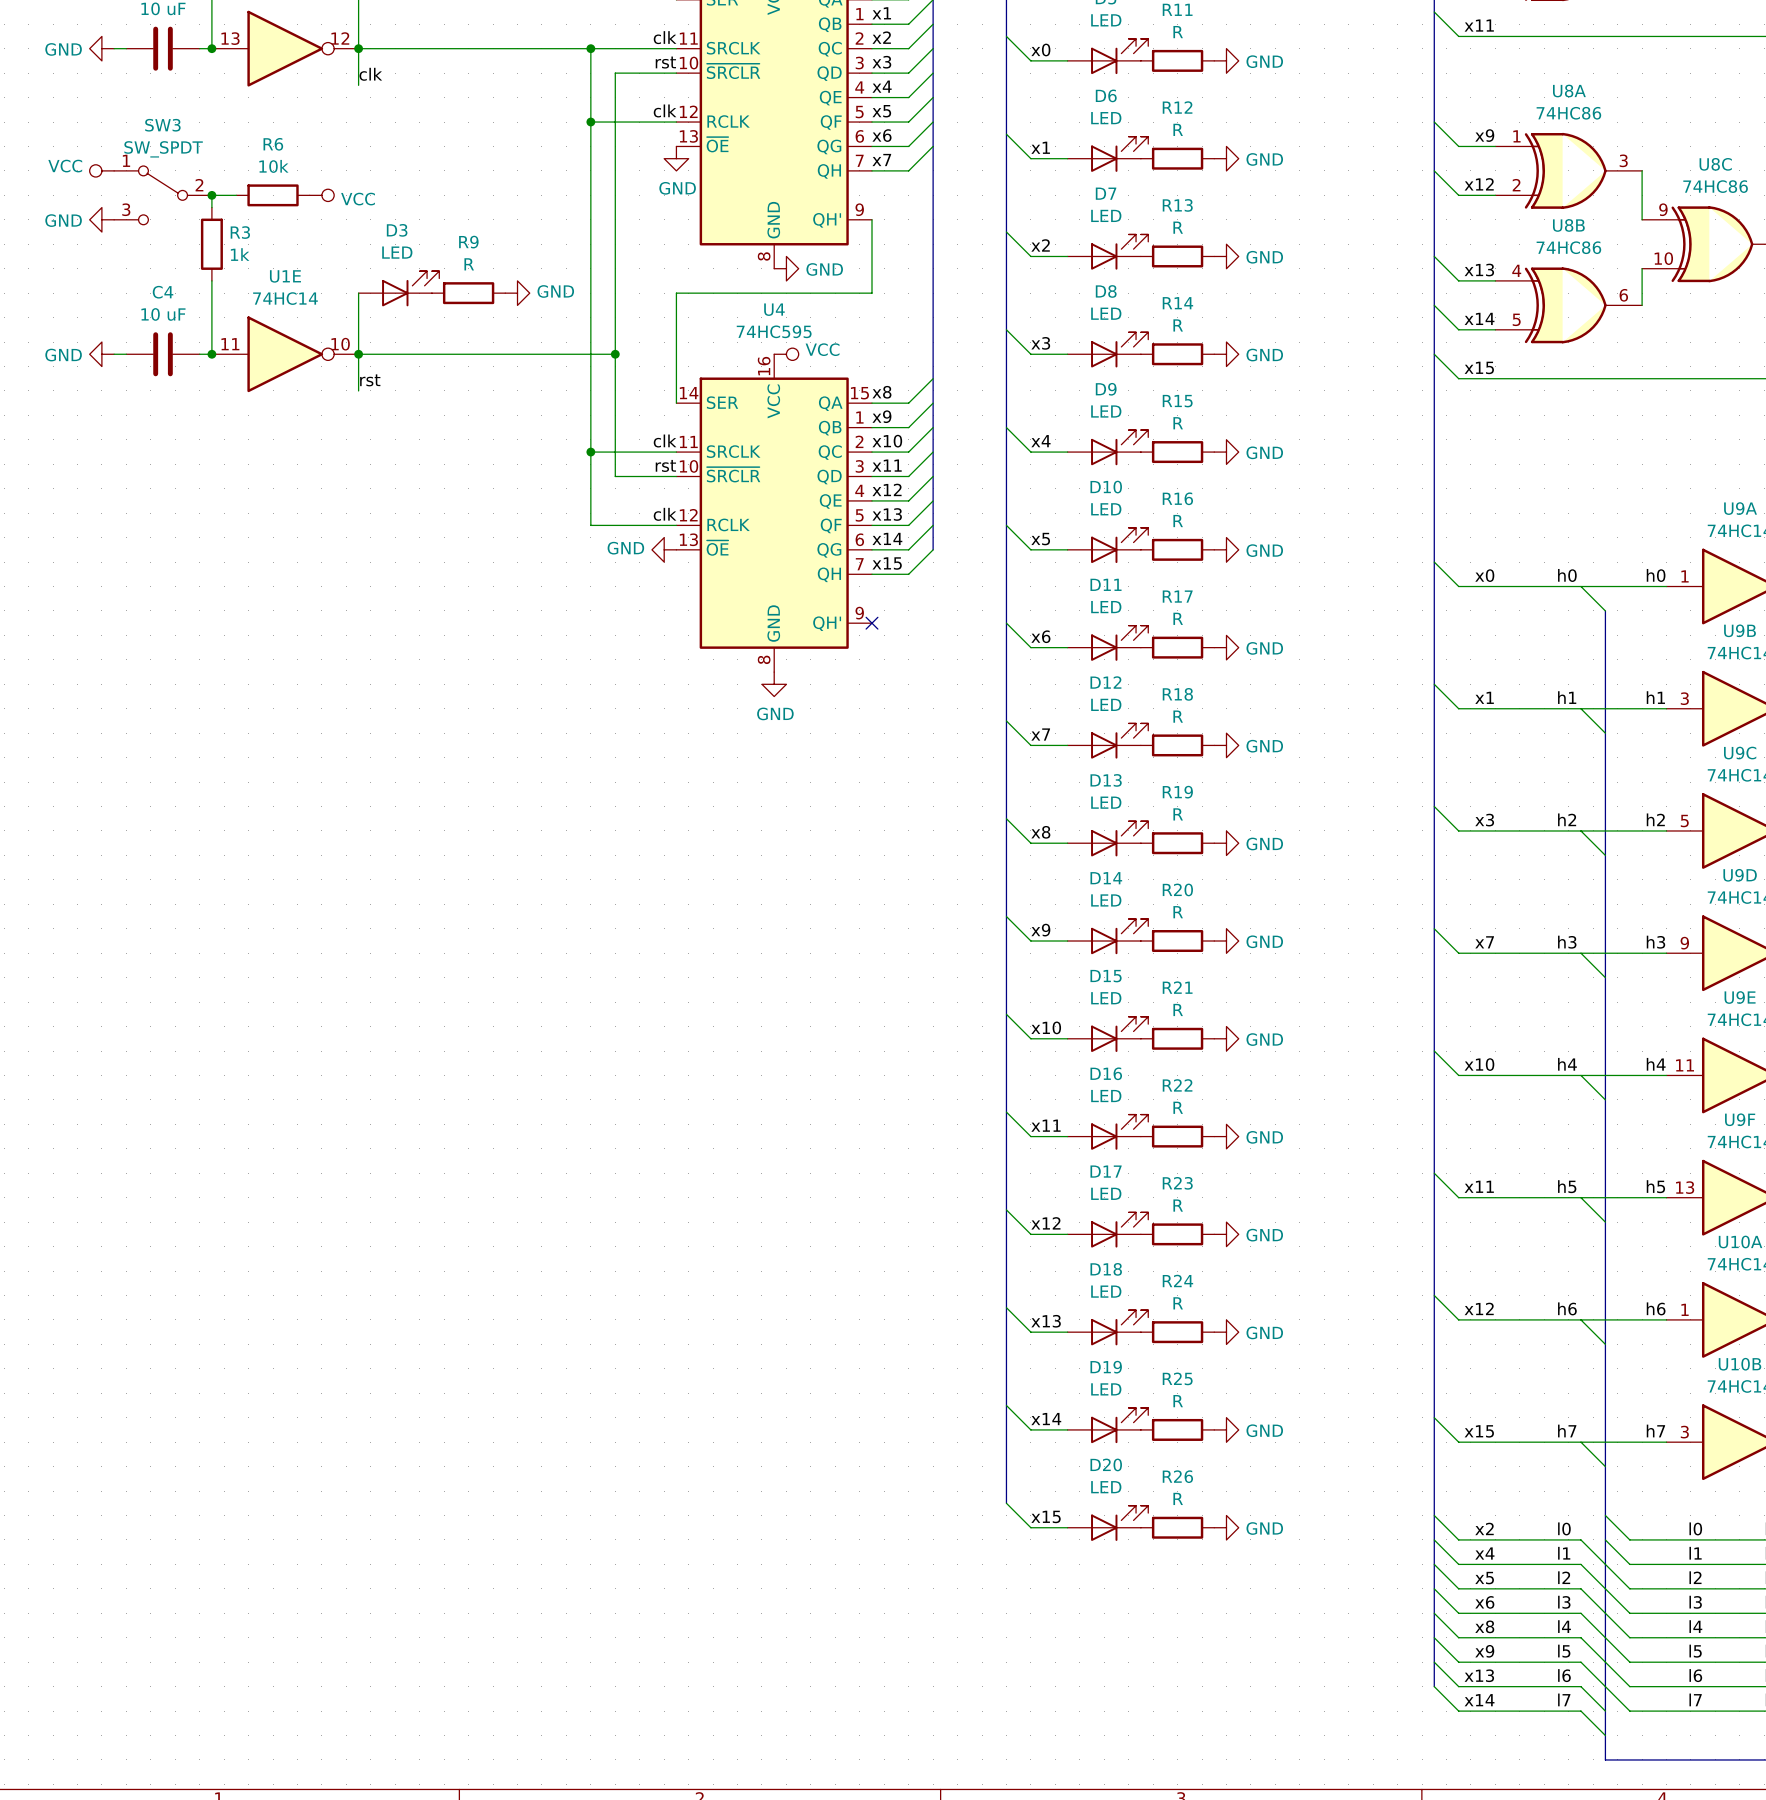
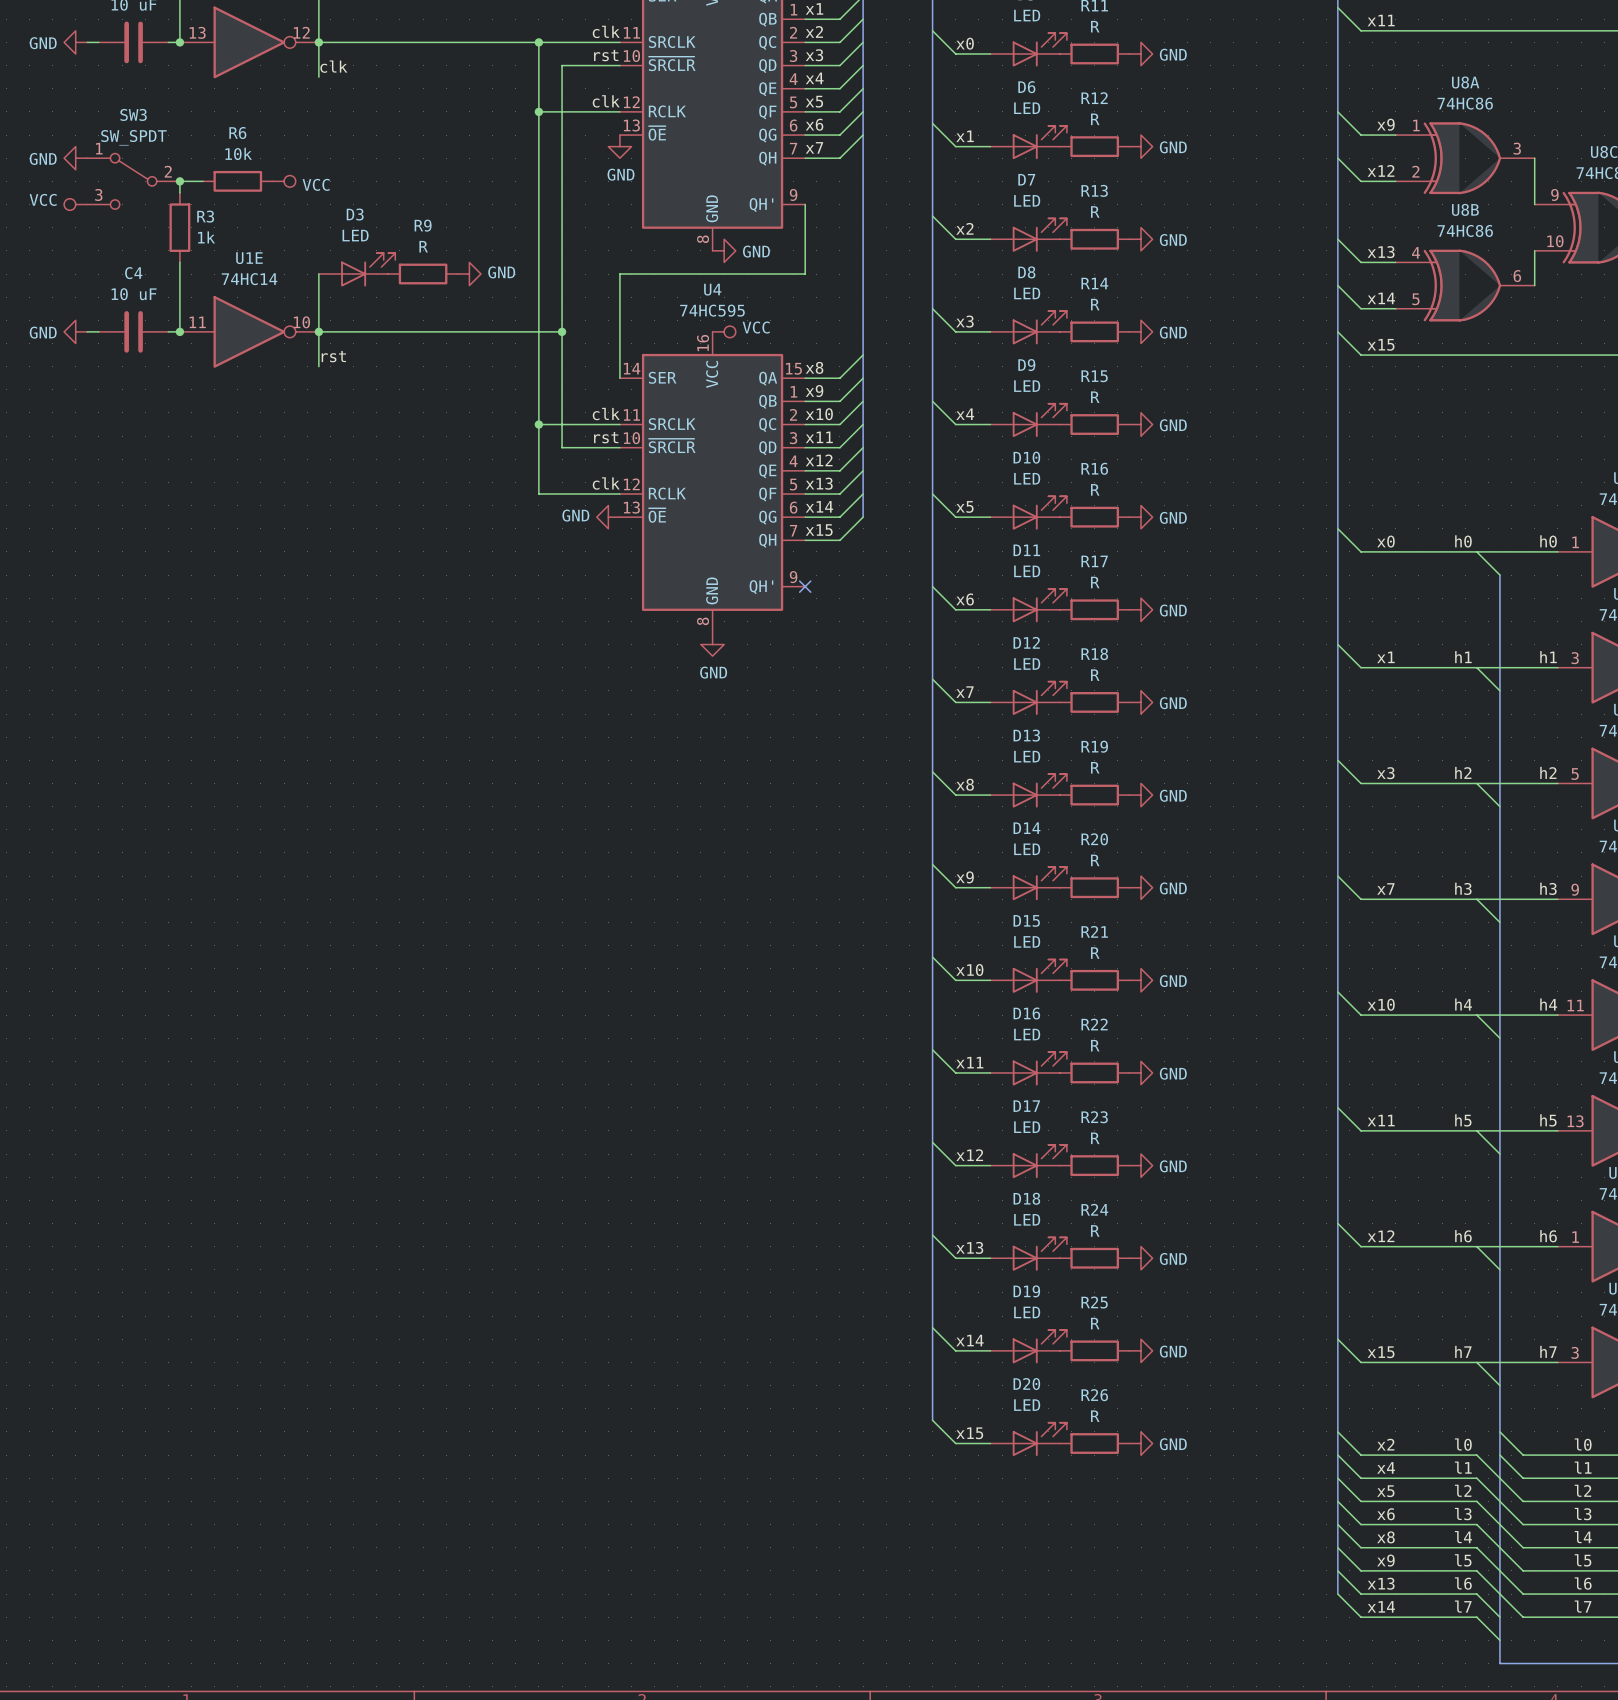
power symbol: VCC (101, 170) -> GND (75, 158)
power symbol: GND (101, 219) -> VCC (75, 204)

